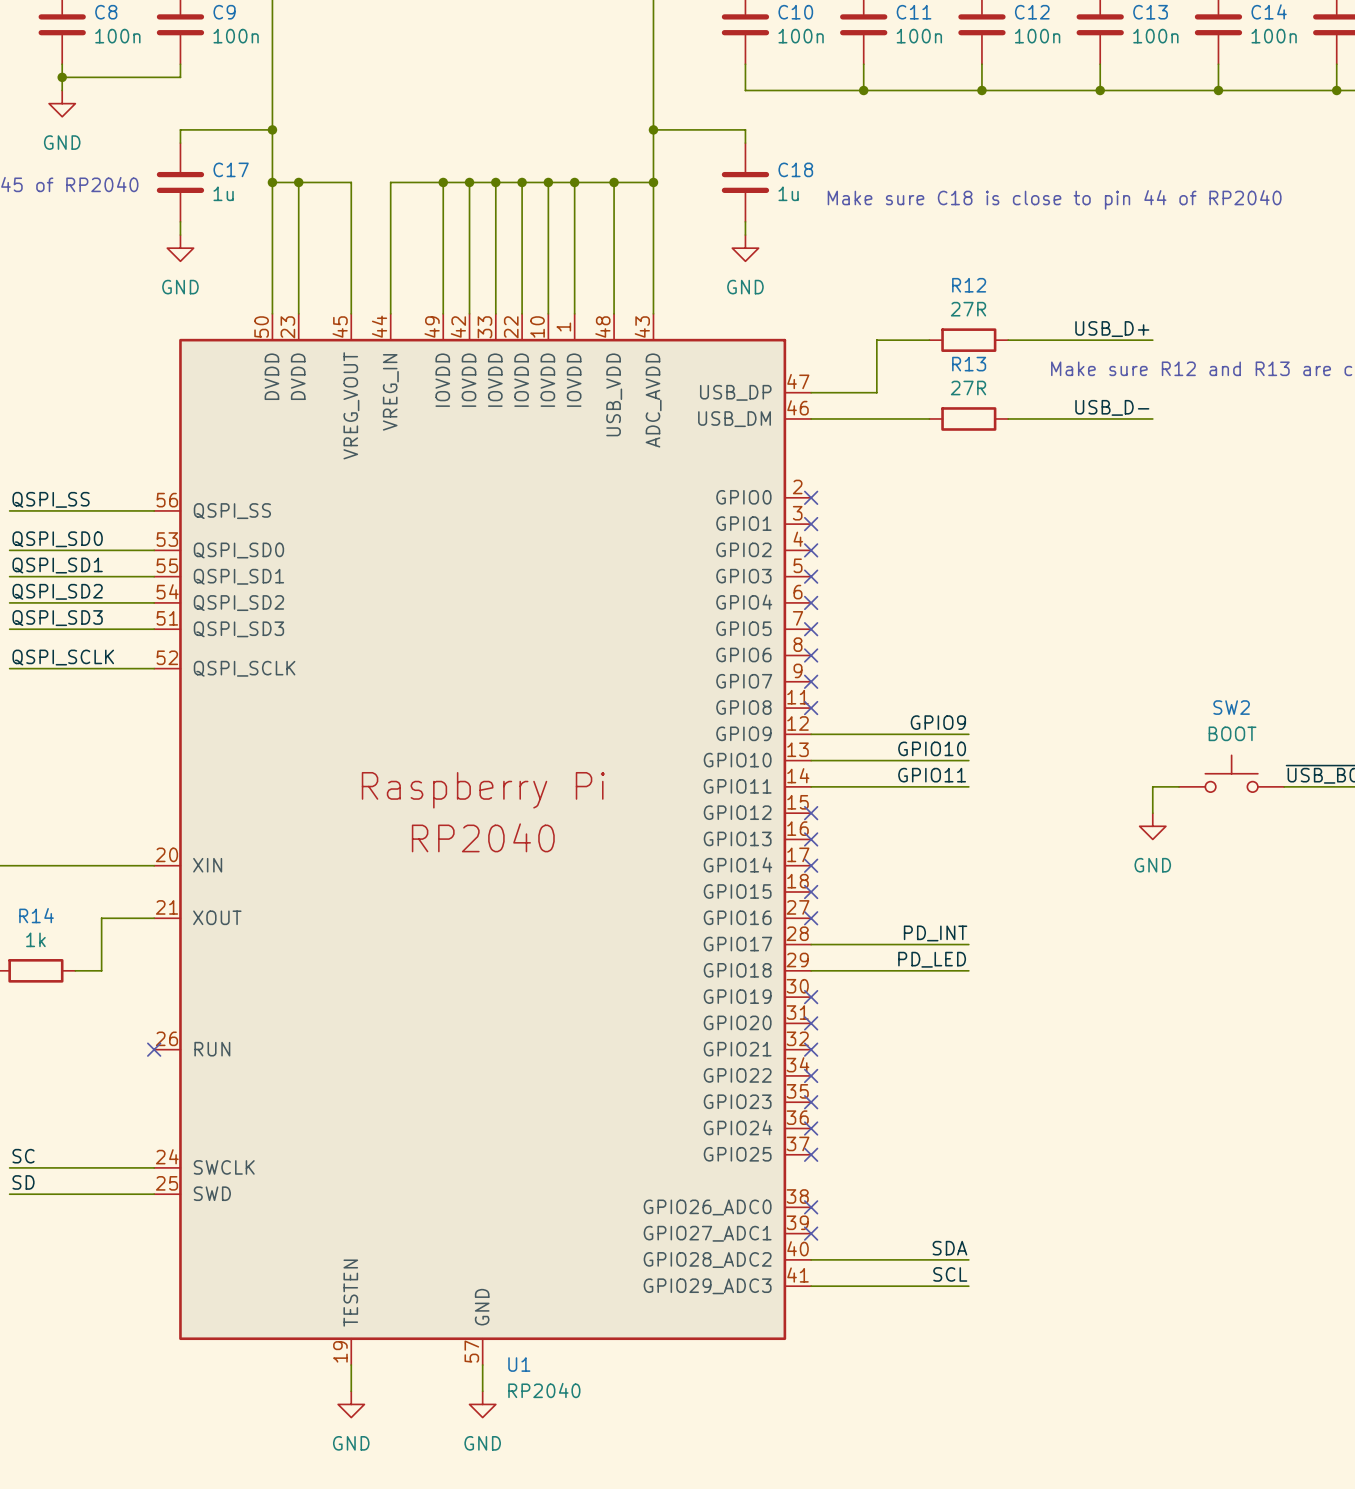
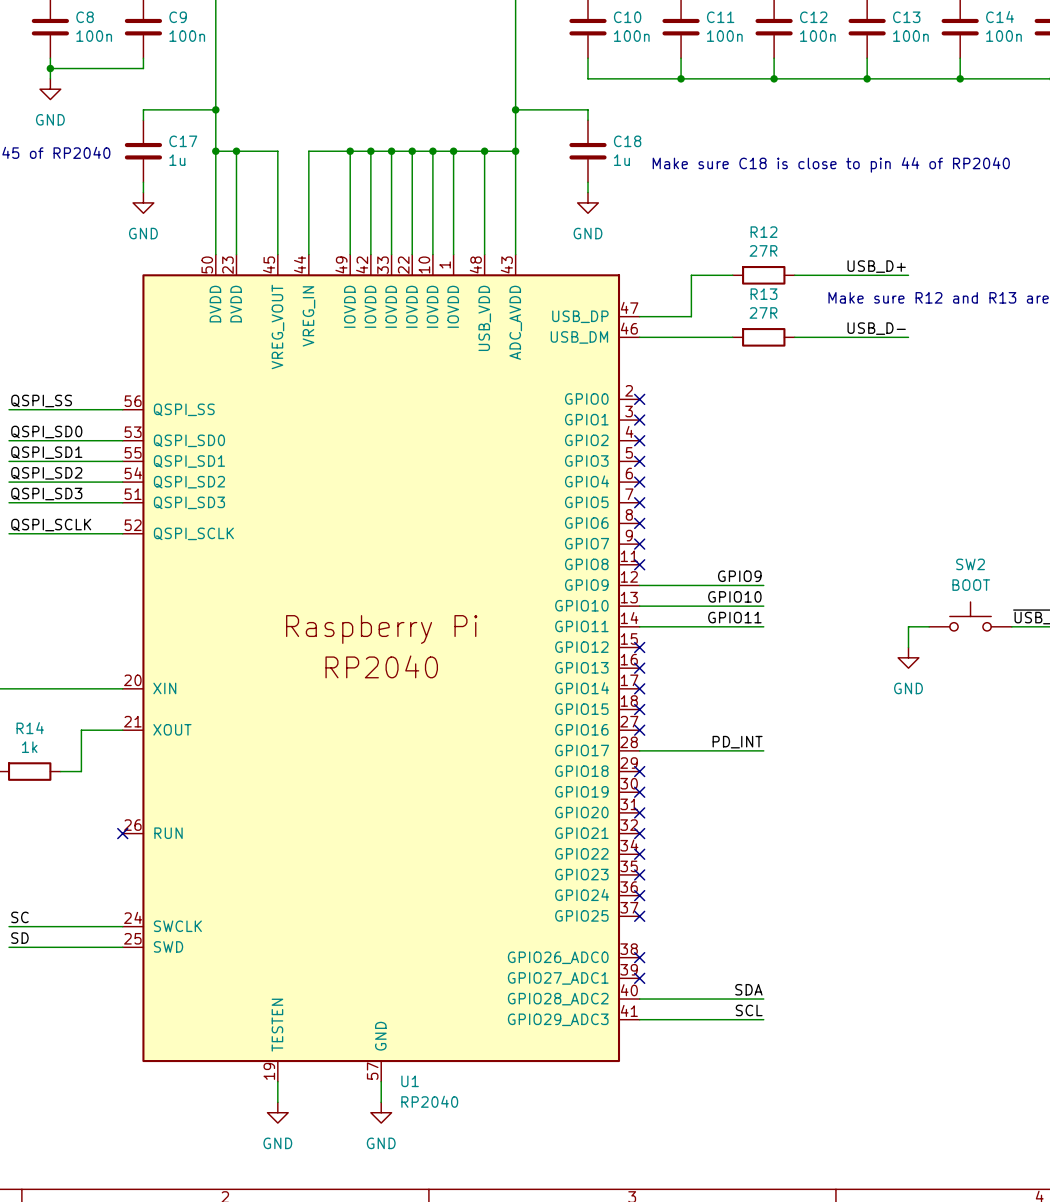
label: PD_LED (932, 959) -> none
wire: (811, 970) (968, 970) -> none
no-connect mark: none -> (639, 771)

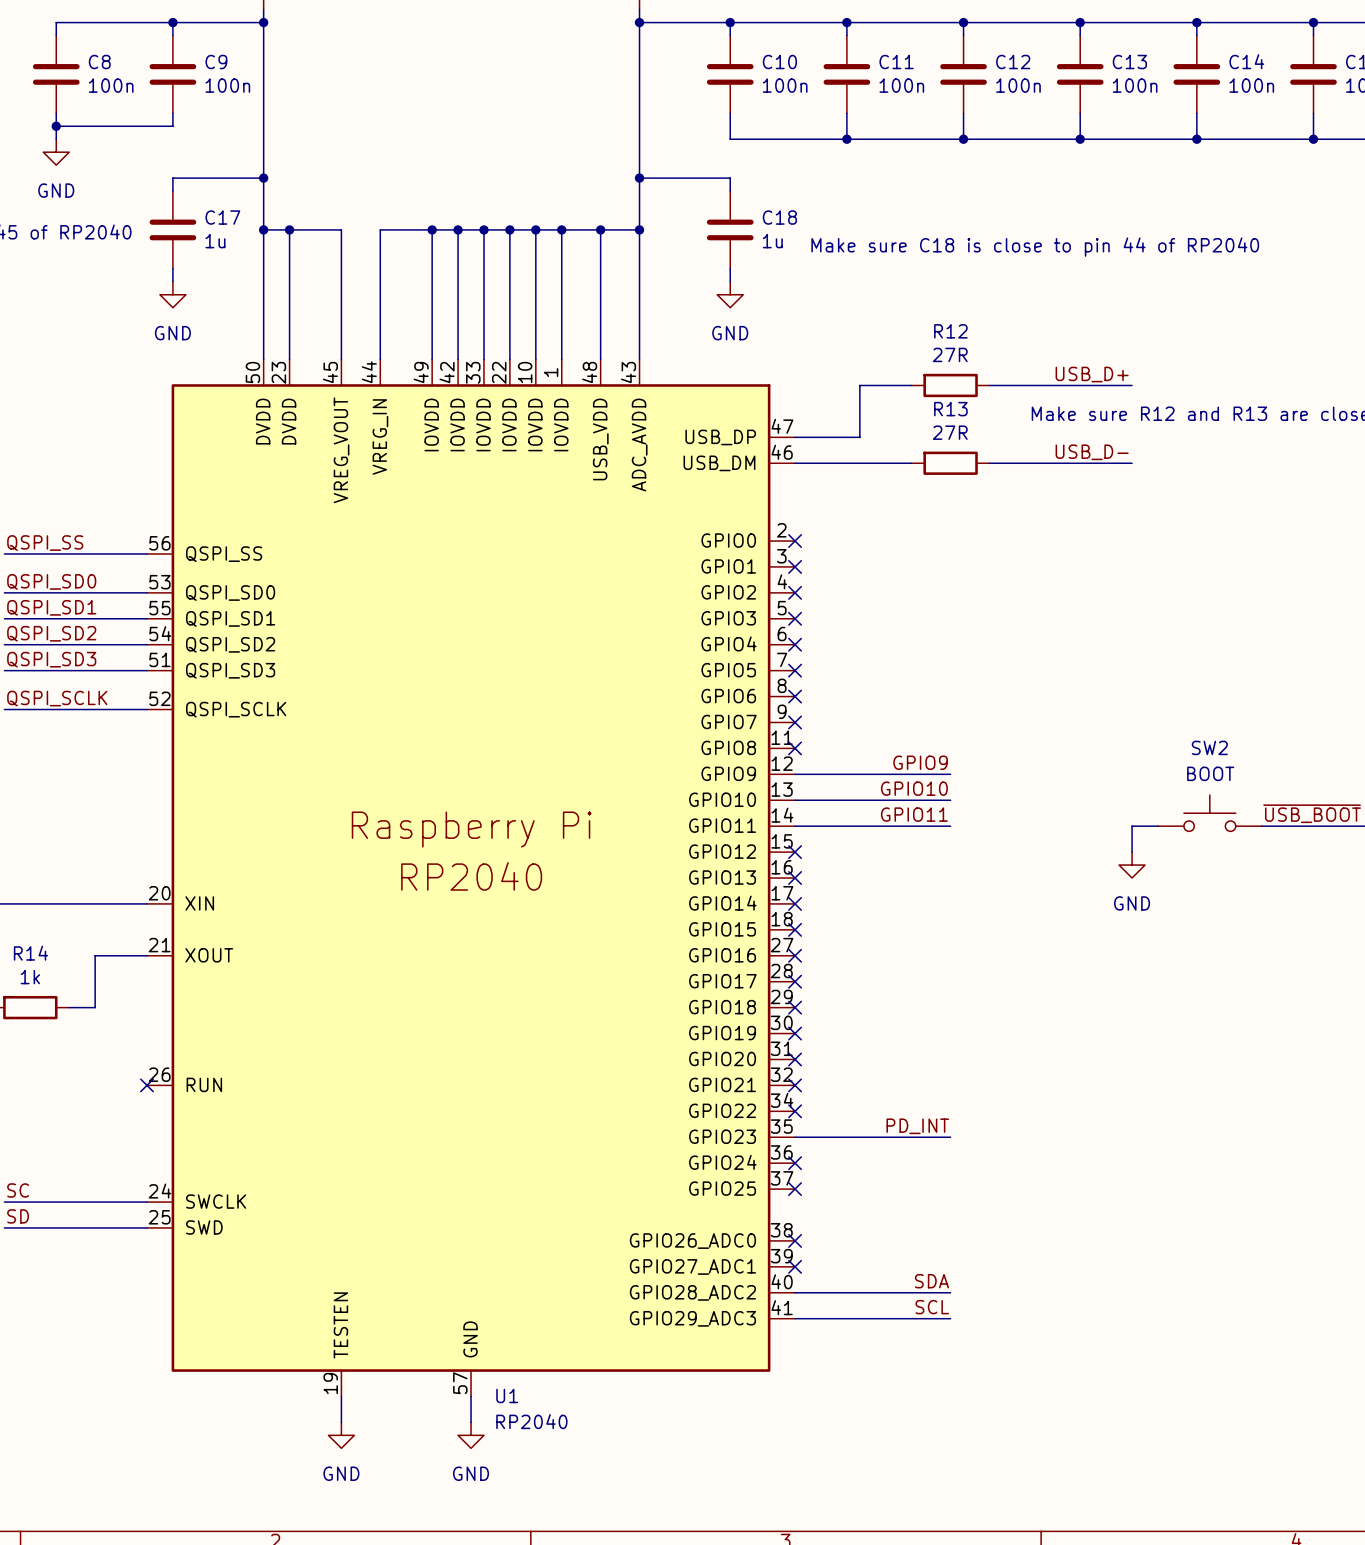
label position: PD_INT (737, 742) -> PD_INT (917, 1126)
wire: (639, 750) (763, 750) -> (795, 1137) (950, 1137)
no-connect mark: none -> (795, 981)
no-connect mark: (639, 874) -> none

